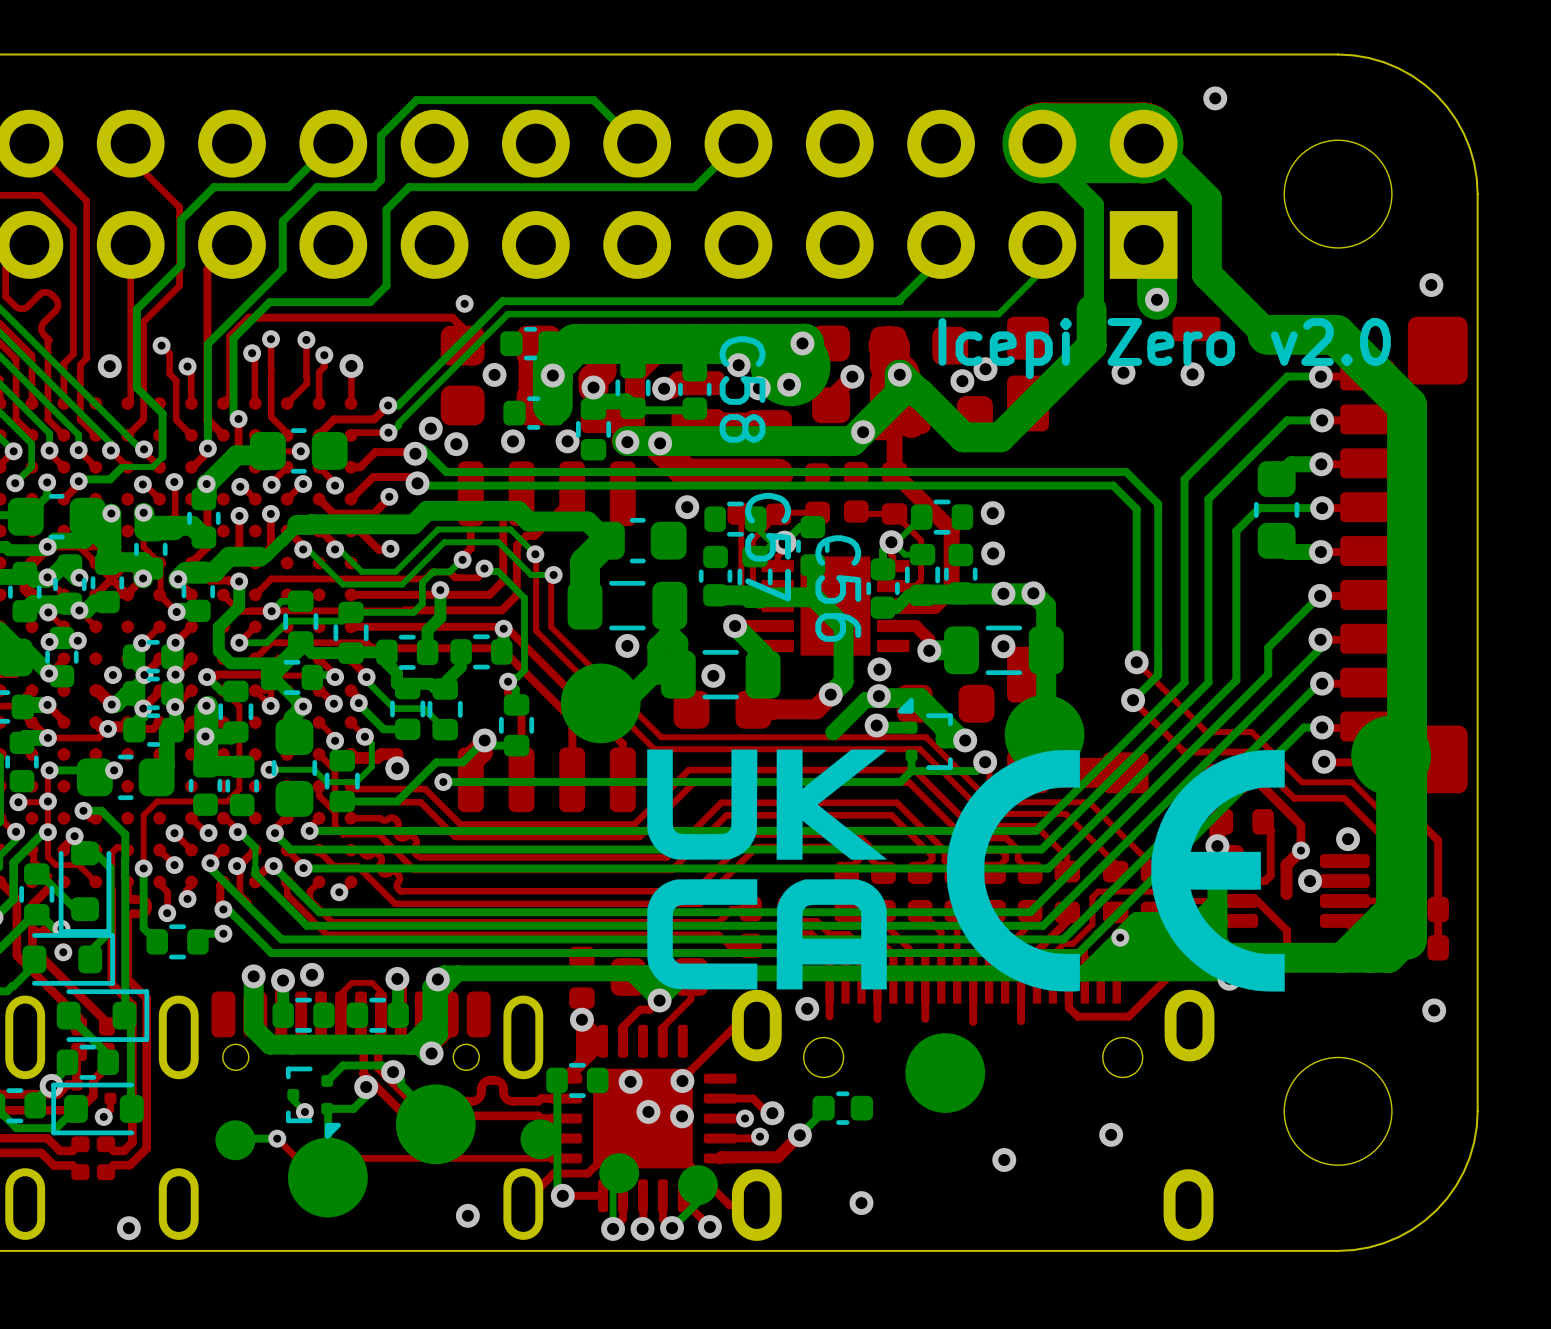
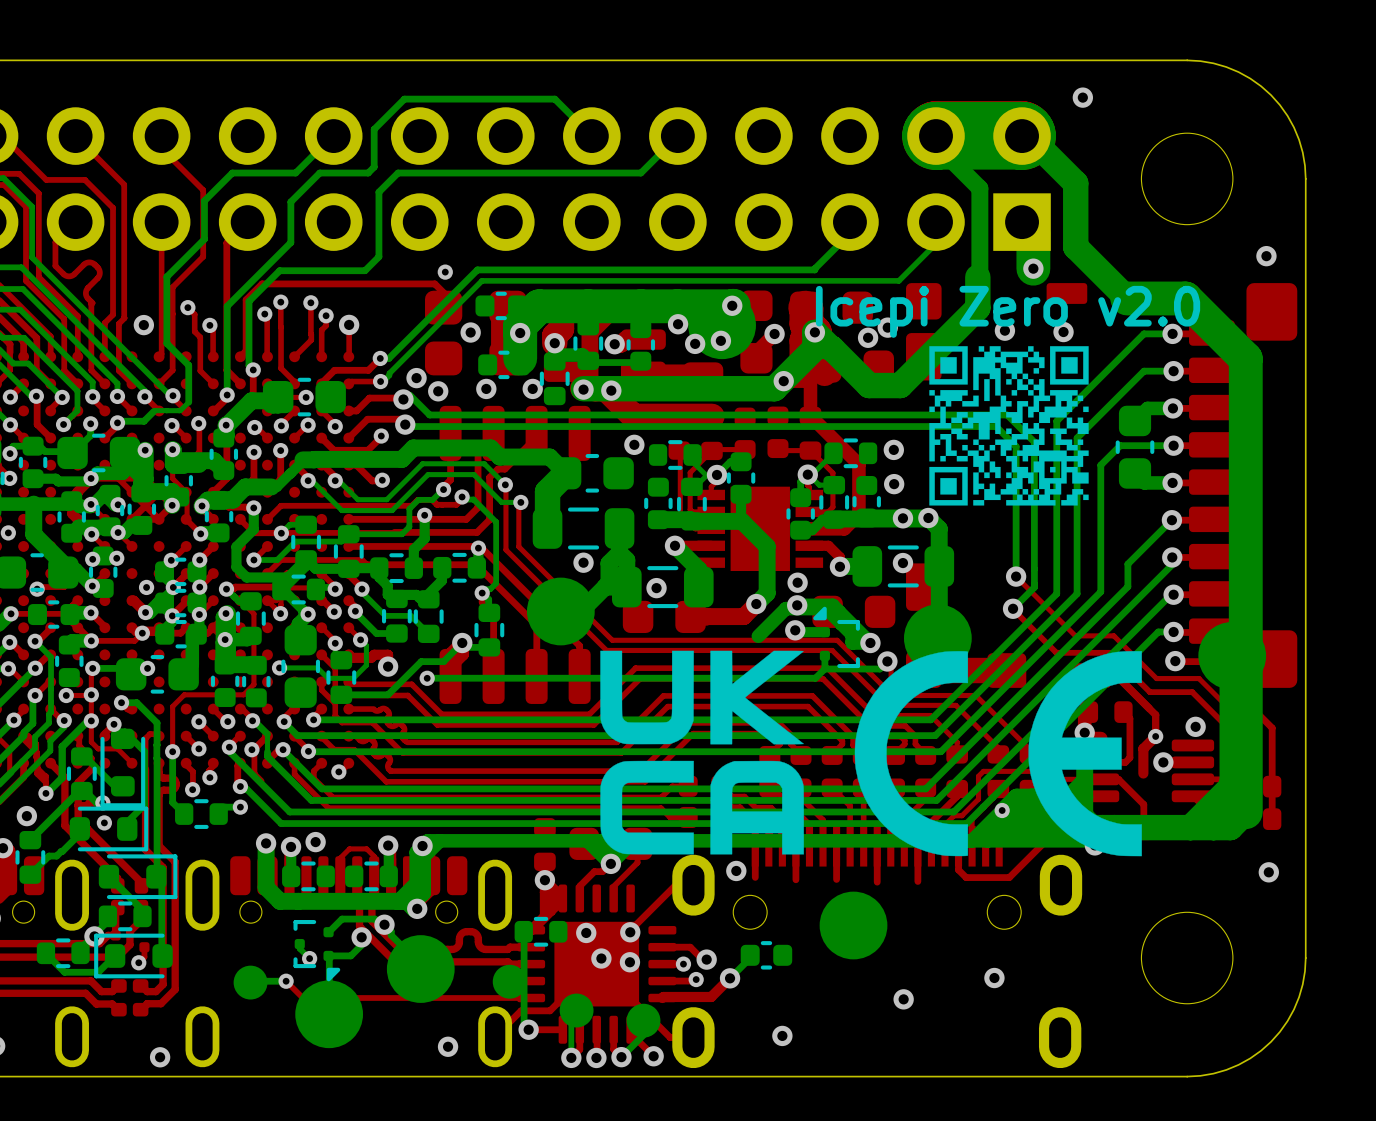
text position: Icepi Zero v2.0 (1164, 348) -> Icepi Zero v2.0 (1008, 311)
C58 name: C58 (742, 389) -> none
drawing: none -> [929, 346, 1089, 506]
C57 name: C57 (768, 547) -> none
C56 name: C56 (838, 588) -> none

